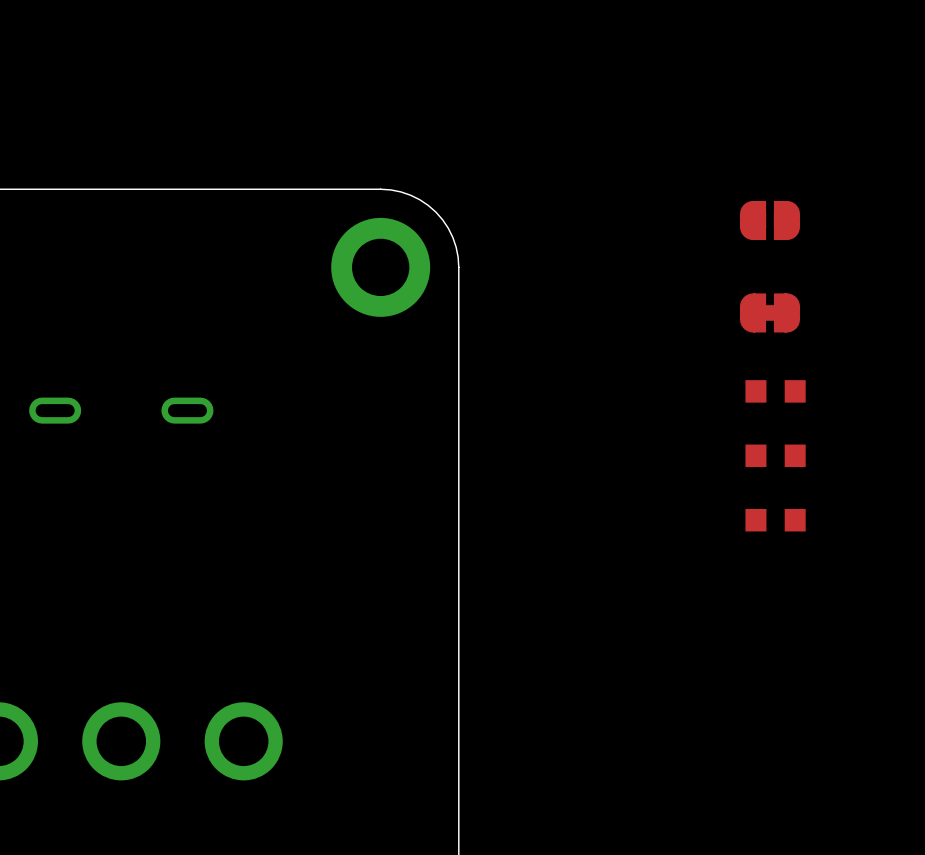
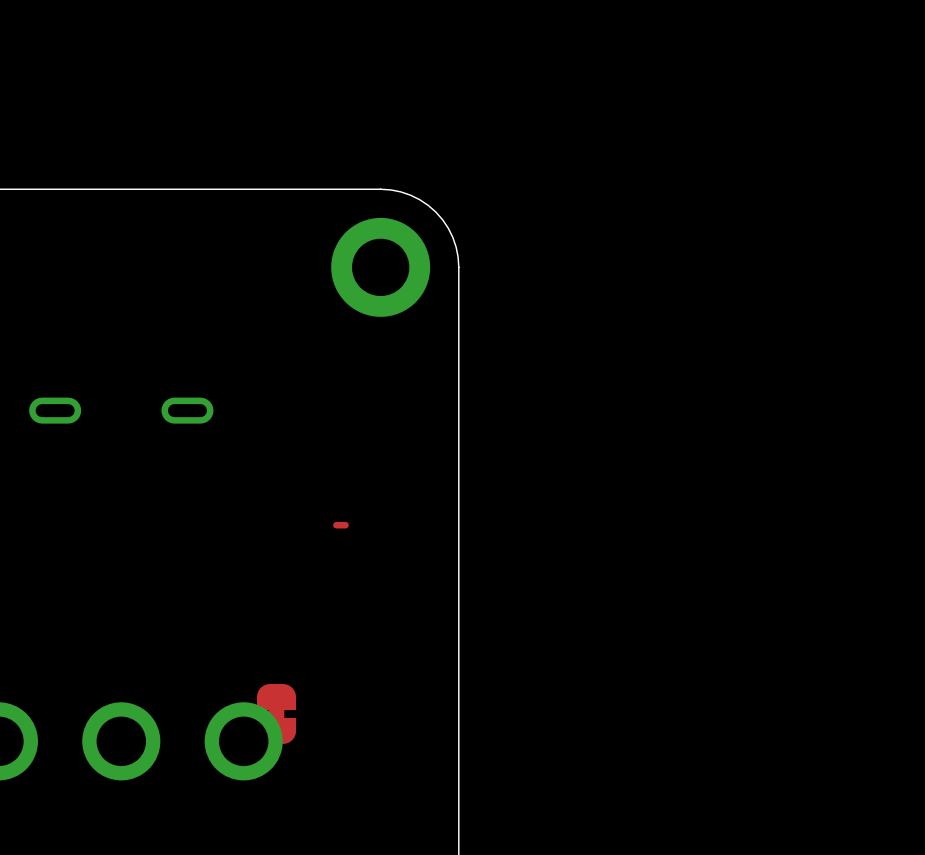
part: (770, 220) -> none
part: (770, 312) -> none
part: (775, 391) -> none
part: (775, 455) -> none
part: (775, 520) -> none
top track: none -> (345, 525) (336, 525)
part: none -> (276, 714)

